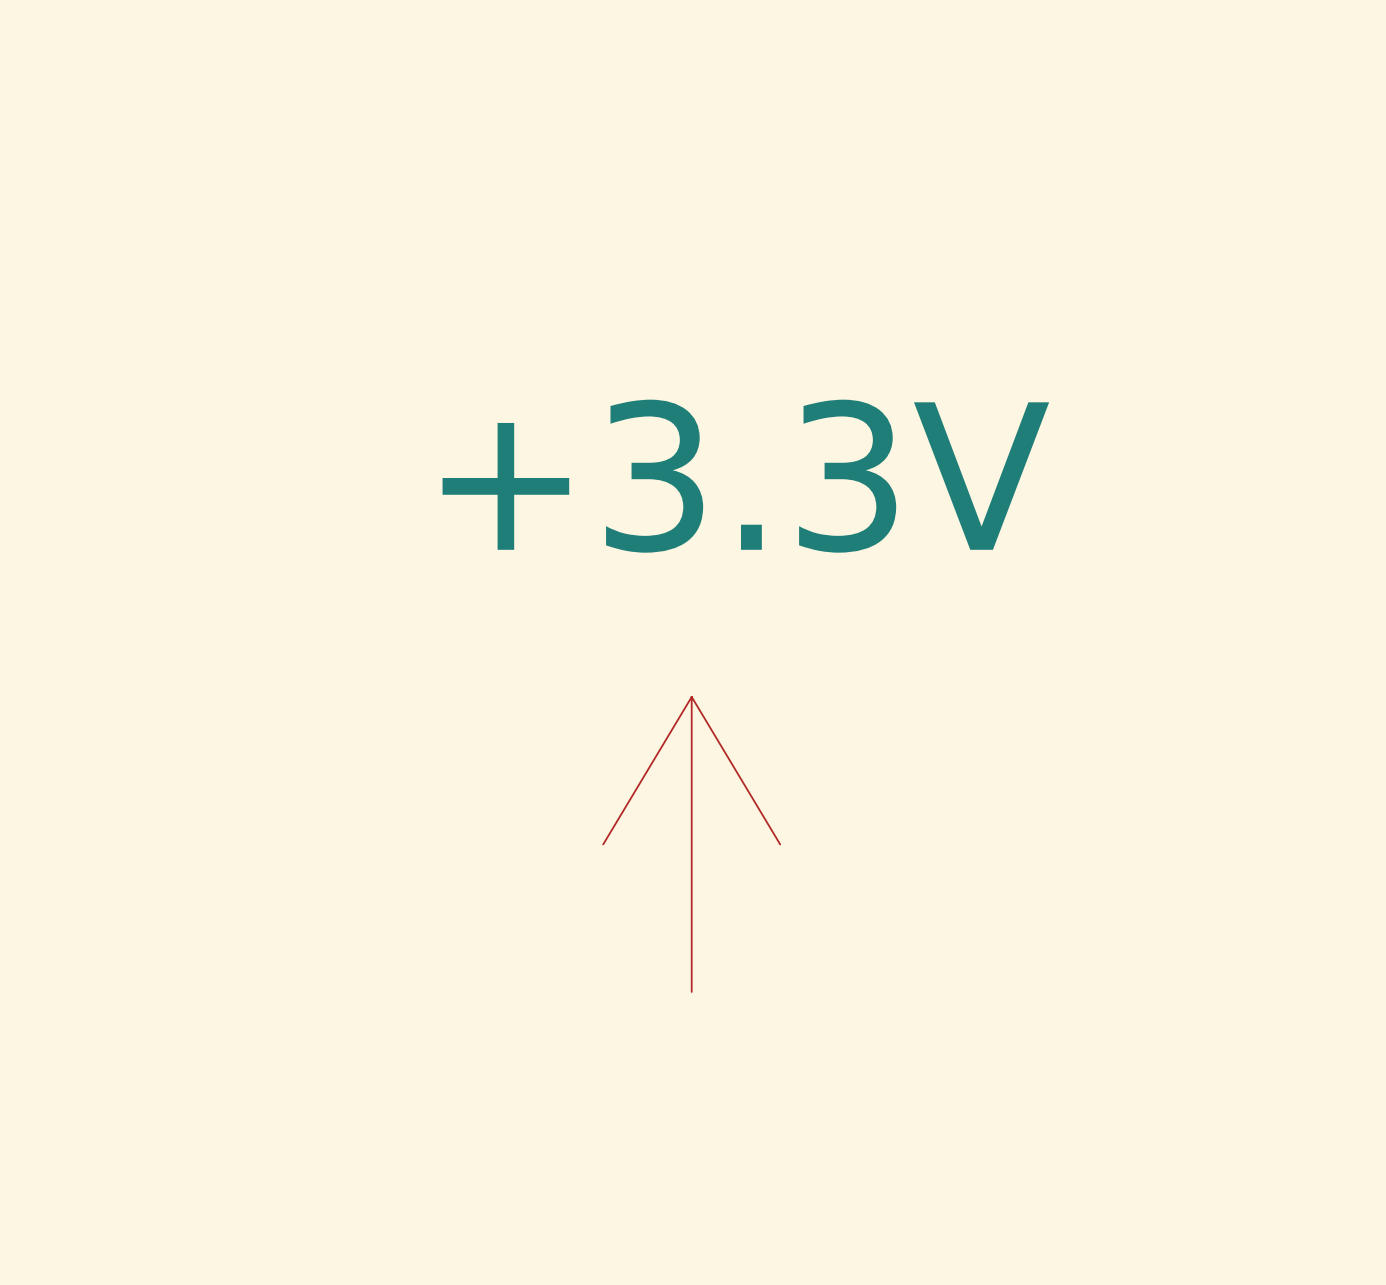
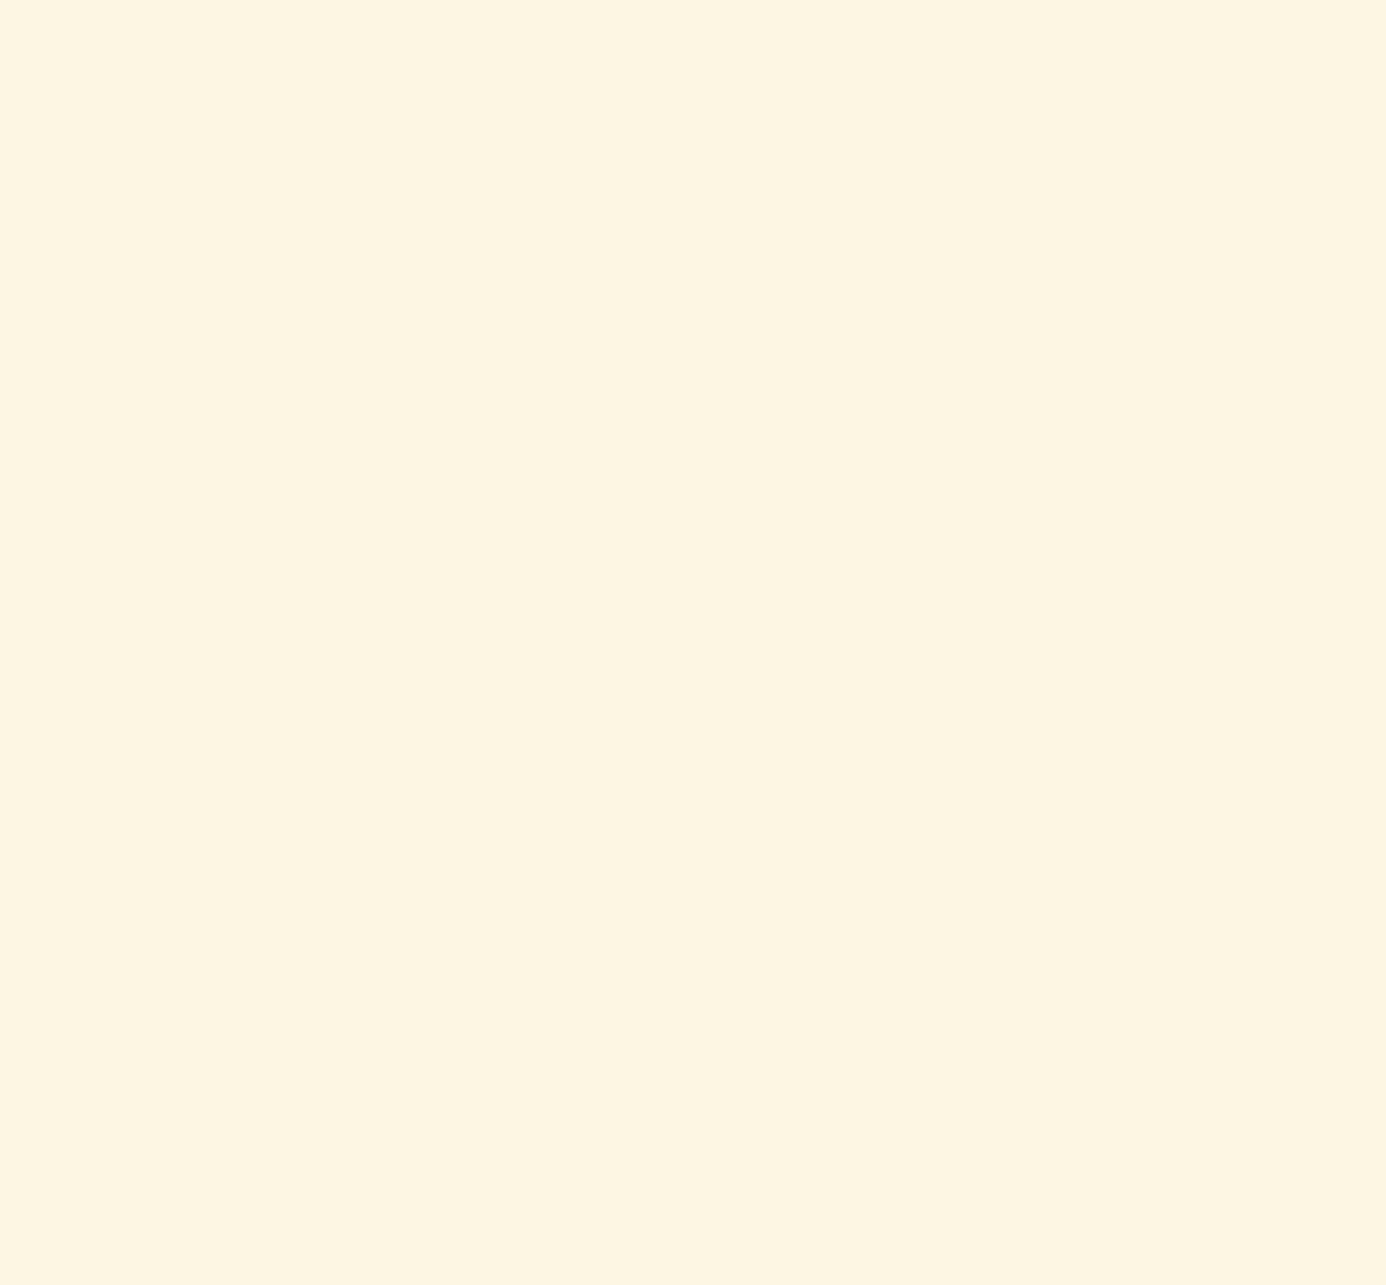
power symbol: +3.3V (691, 844) -> none

